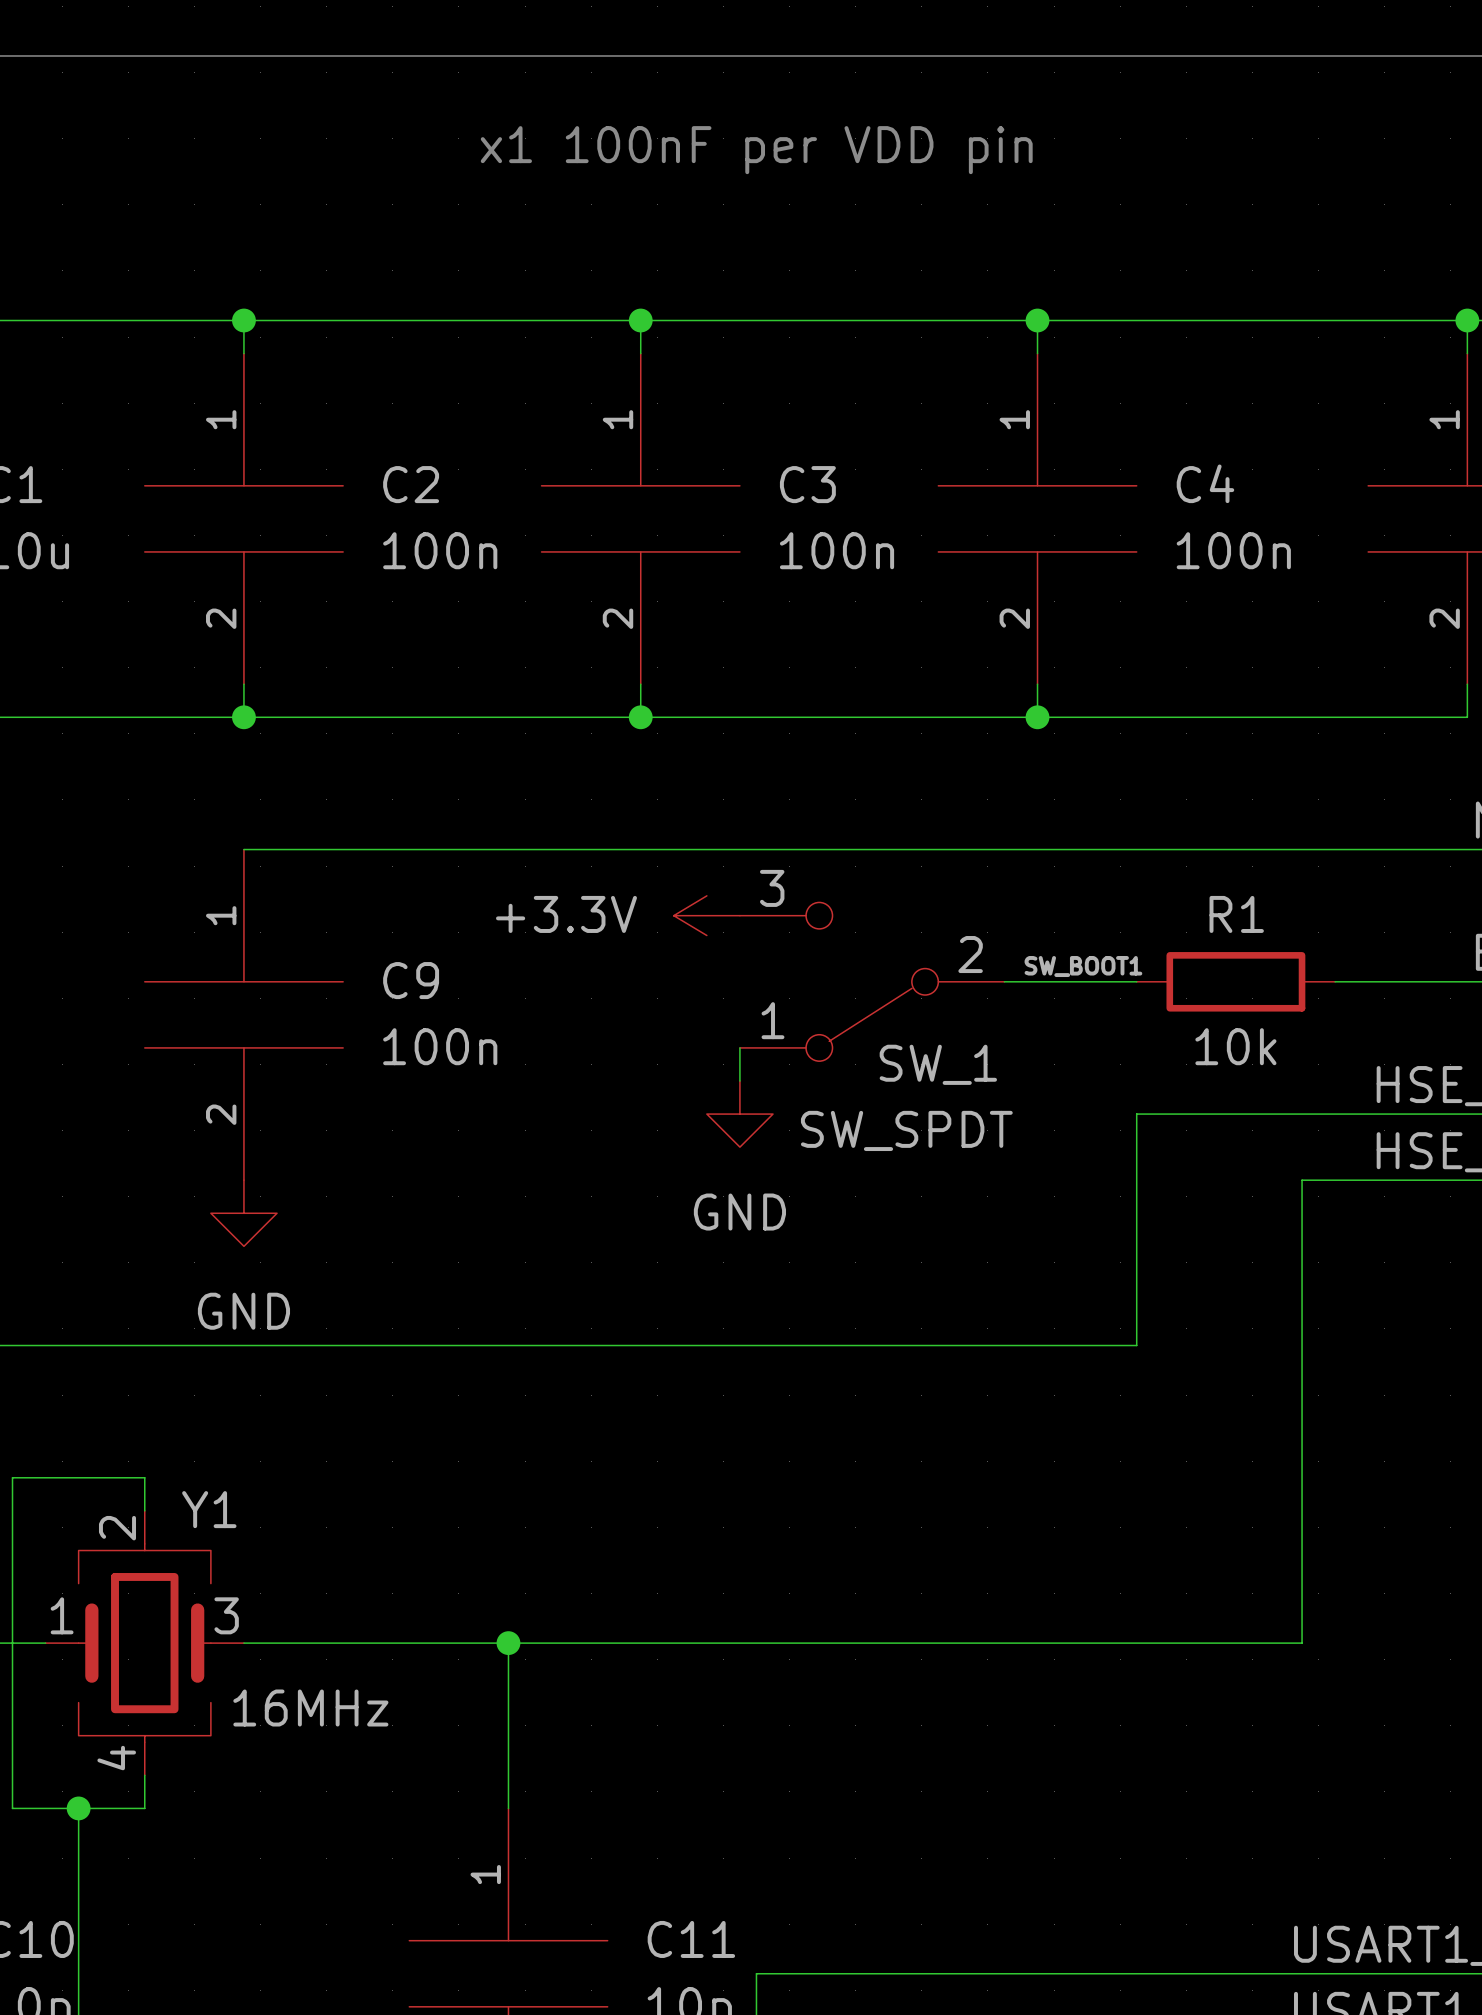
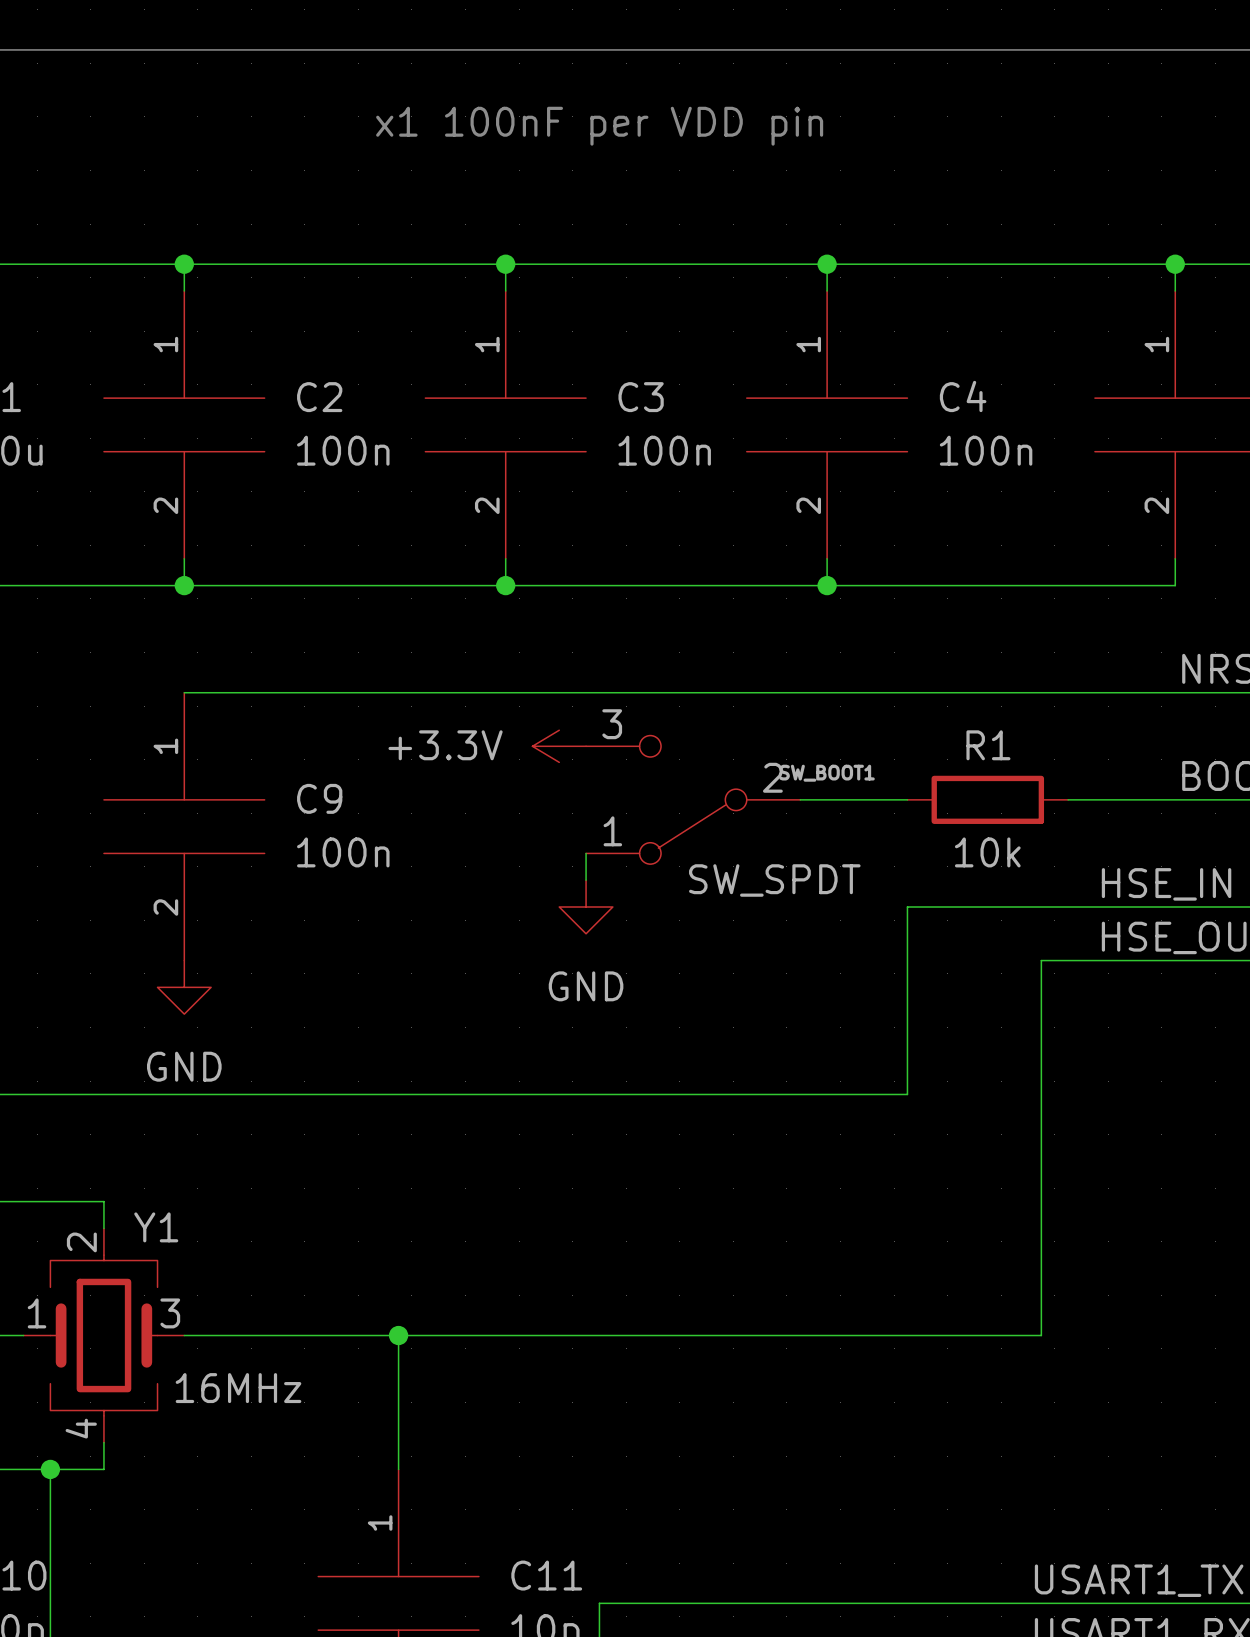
label: SW_BOOT1 (1083, 966) -> none
SW_1 name: SW_1 (938, 1064) -> SW_BOOT1 (827, 773)
SW_1 value position: SW_SPDT (906, 1130) -> SW_SPDT (774, 880)

